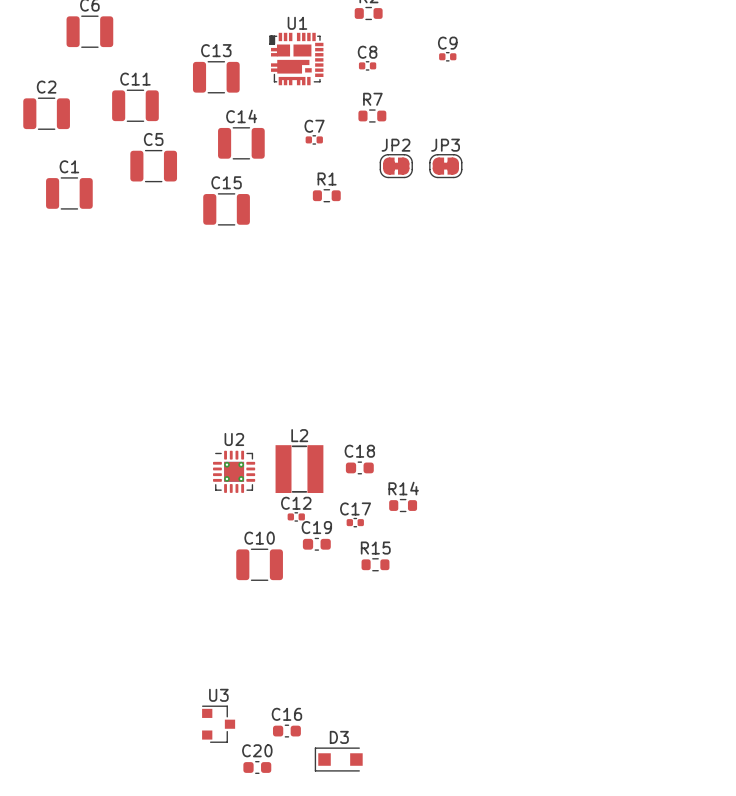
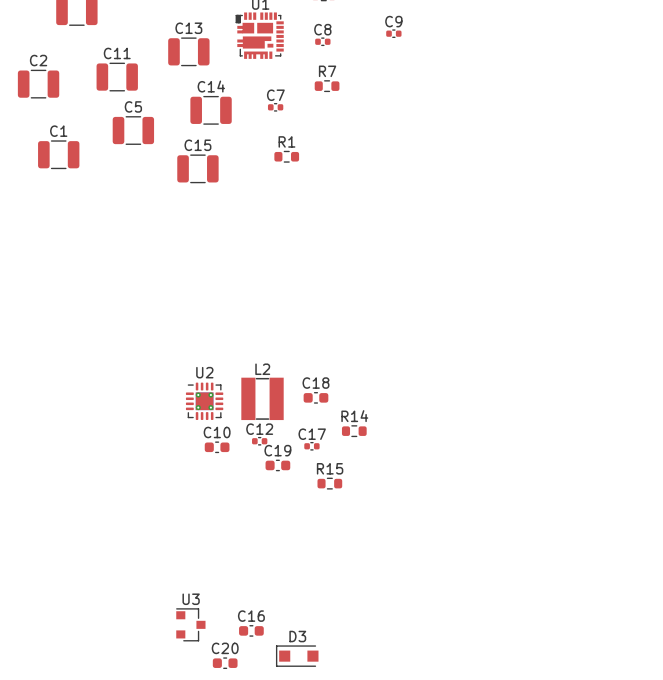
JP2: (396, 166) -> none
JP3: (445, 166) -> none
C10 footprint: [236, 548, 283, 581] -> [204, 441, 230, 454]

